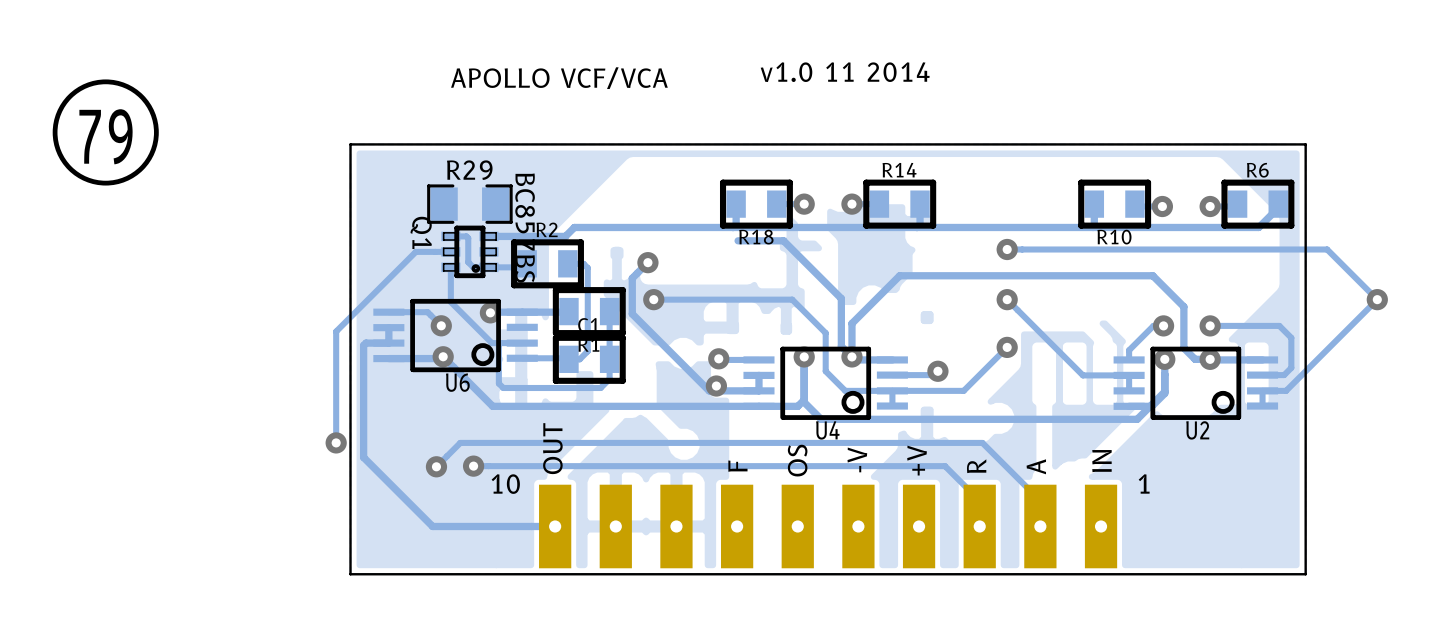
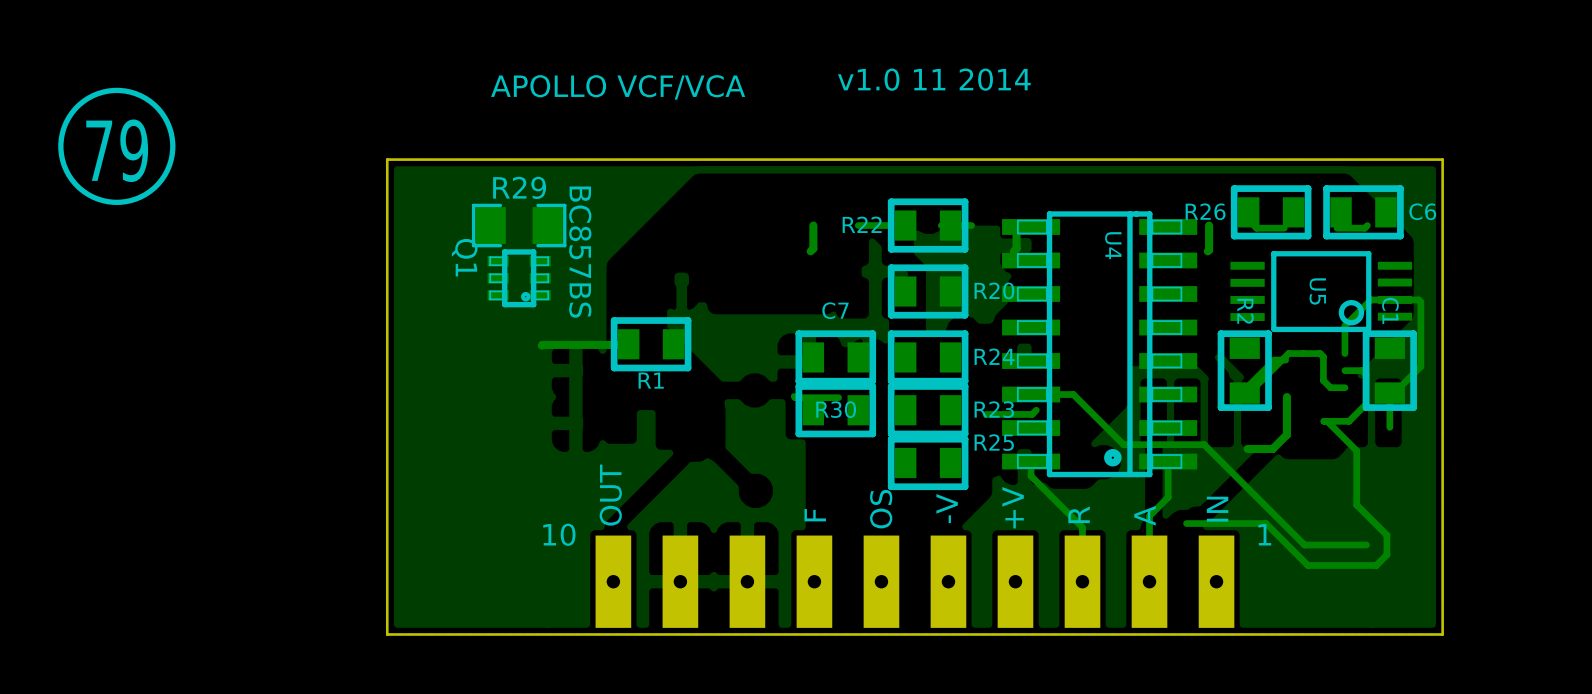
R26: none -> (1271, 212)
C6: none -> (1363, 212)
R18: (756, 204) -> none
via: (804, 204) -> none
R22: none -> (928, 225)
via: (851, 204) -> none
R14: (899, 204) -> none
R10: (1114, 204) -> none
R6: (1257, 204) -> none
track: (1278, 204) (1278, 208) (1258, 227) (574, 227) (565, 236) (488, 236) -> none
via: (1162, 206) -> none
via: (1210, 206) -> none
track: (450, 236) (466, 236) (468, 238) (468, 262) (473, 267) (523, 267) (527, 263) -> none
track: (738, 240) (783, 240) (841, 298) (841, 346) (854, 359) (892, 359) -> none
track: (1007, 249) (1327, 249) (1377, 299) (1286, 390) (1262, 390) (1262, 406) -> none
via: (1007, 249) -> none
track: (450, 251) (415, 251) (336, 331) (336, 442) -> none
track: (647, 262) (632, 278) (632, 313) (709, 390) (758, 390) (758, 375) -> none
via: (647, 262) -> none
R2 rotation: 0° (547, 263) -> 90° clockwise (1244, 370)
R2 position: (547, 263) -> (1244, 370)
track: (567, 263) (583, 263) (587, 268) (587, 351) (579, 359) (522, 358) -> none
R20: none -> (928, 291)
U5: none -> (1321, 291)
track: (450, 267) (450, 302) (491, 343) (534, 343) -> none
track: (653, 299) (792, 299) (825, 333) (825, 371) (845, 390) (963, 390) (1007, 347) -> none
via: (653, 299) -> none
track: (1007, 299) (1082, 375) (1129, 375) (1129, 390) -> none
via: (1007, 299) -> none
via: (1377, 299) -> none
track: (609, 311) (609, 379) (600, 387) (503, 387) (498, 383) (498, 344) (500, 343) -> none
track: (388, 312) (427, 312) (441, 325) -> none
via: (490, 312) -> none
track: none -> (1344, 353) (1344, 325) (1370, 299) (1418, 299) (1420, 301) (1420, 366) (1394, 393) (1389, 393) (1389, 427)
C7: none -> (835, 357)
R24: none -> (928, 357)
via: (441, 325) -> none
via: (1163, 325) -> none
track: (1210, 325) (1279, 325) (1291, 337) (1291, 367) (1284, 375) (1262, 375) -> none
via: (1210, 325) -> none
track: (388, 327) (388, 343) (366, 343) (363, 345) (363, 457) (432, 526) (555, 526) -> none
U6: (455, 335) -> none
track: none -> (1344, 370) (1362, 370) (1366, 374) (1366, 404) (1349, 421) (1323, 421)
U4 footprint: [743, 346, 908, 420] -> [1002, 211, 1198, 478]
via: (1007, 347) -> none
track: none -> (1344, 387) (1330, 387) (1323, 380) (1323, 356) (1320, 353) (1288, 353) (1249, 393) (1244, 393)
via: (443, 356) -> none
track: (804, 356) (804, 402) (821, 419) (1137, 419) (1164, 391) -> none
via: (804, 356) -> none
track: (851, 356) (851, 323) (899, 275) (1152, 275) (1183, 306) (1183, 348) (1195, 359) (1262, 359) -> none
via: (851, 356) -> none
track: none -> (1031, 394) (1073, 394) (1123, 444) (1204, 444) (1304, 545) (1366, 545)
track: (388, 358) (441, 358) (443, 356) (492, 406) (797, 406) (804, 399) -> none
via: (718, 358) -> none
C1 rotation: 0° (589, 359) -> 90° clockwise (1389, 370)
C1 position: (589, 359) -> (1389, 370)
via: (1164, 359) -> none
via: (1210, 359) -> none
R30: none -> (835, 410)
R23: none -> (928, 410)
via: (937, 371) -> none
track: none -> (1327, 421) (1356, 450) (1356, 504) (1386, 535) (1386, 554) (1376, 565) (1307, 565) (1266, 523) (1186, 523)
U2: (1195, 383) -> none
via: (716, 386) -> none
track: (892, 390) (892, 406) -> none
R25: none -> (928, 462)
U4 name position: U4 (827, 430) -> U4 (1113, 245)
via: (336, 442) -> none
track: (436, 466) (460, 442) (982, 442) (1040, 500) -> (1168, 461) (1168, 497) (1149, 516) (1149, 553)
via: (436, 466) -> none
track: (473, 466) (945, 466) (979, 500) -> (1031, 461) (1031, 476) (1082, 527) (1082, 553)
via: (473, 466) -> none

